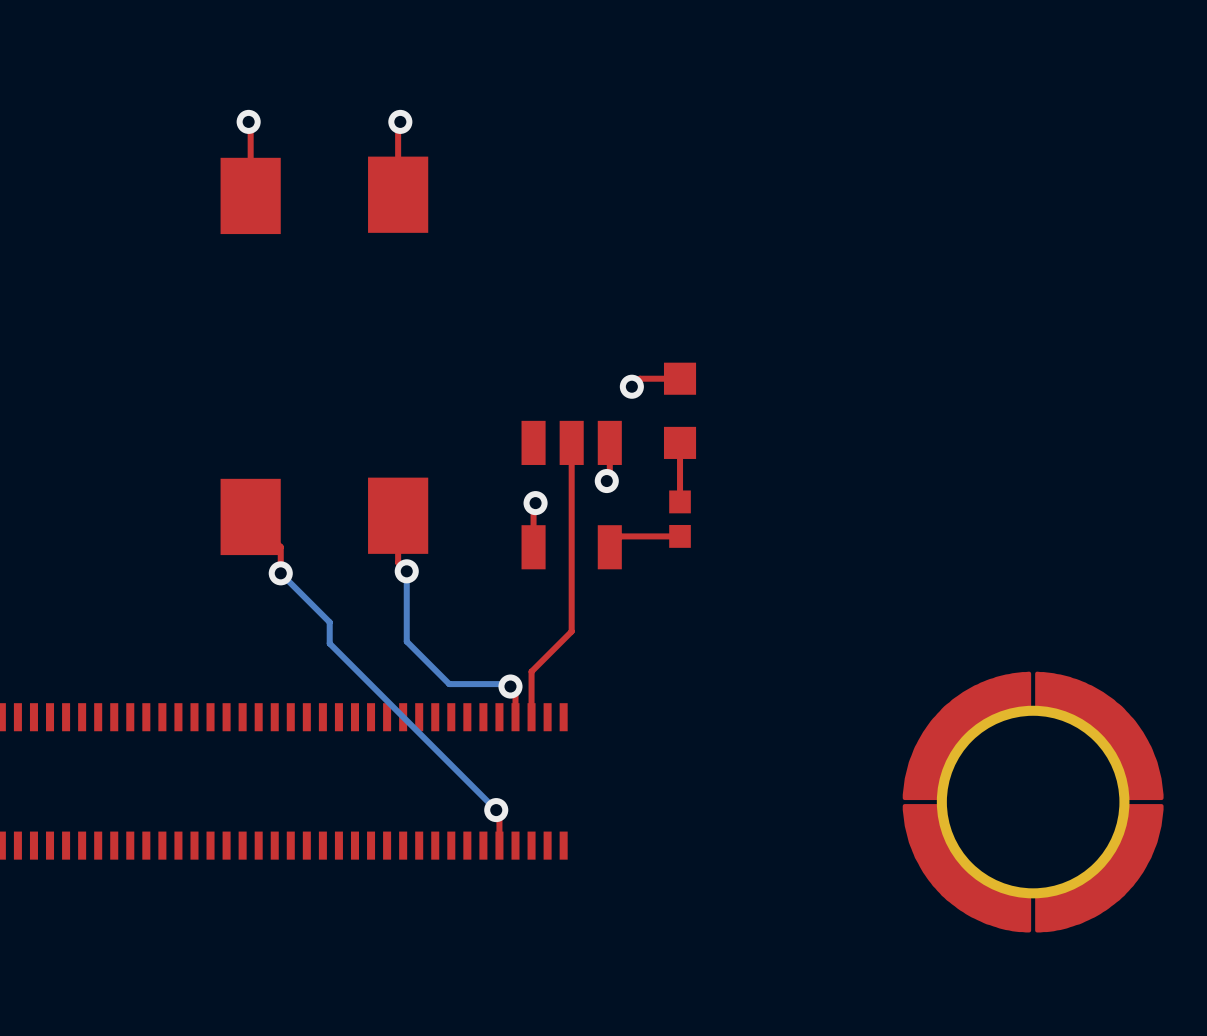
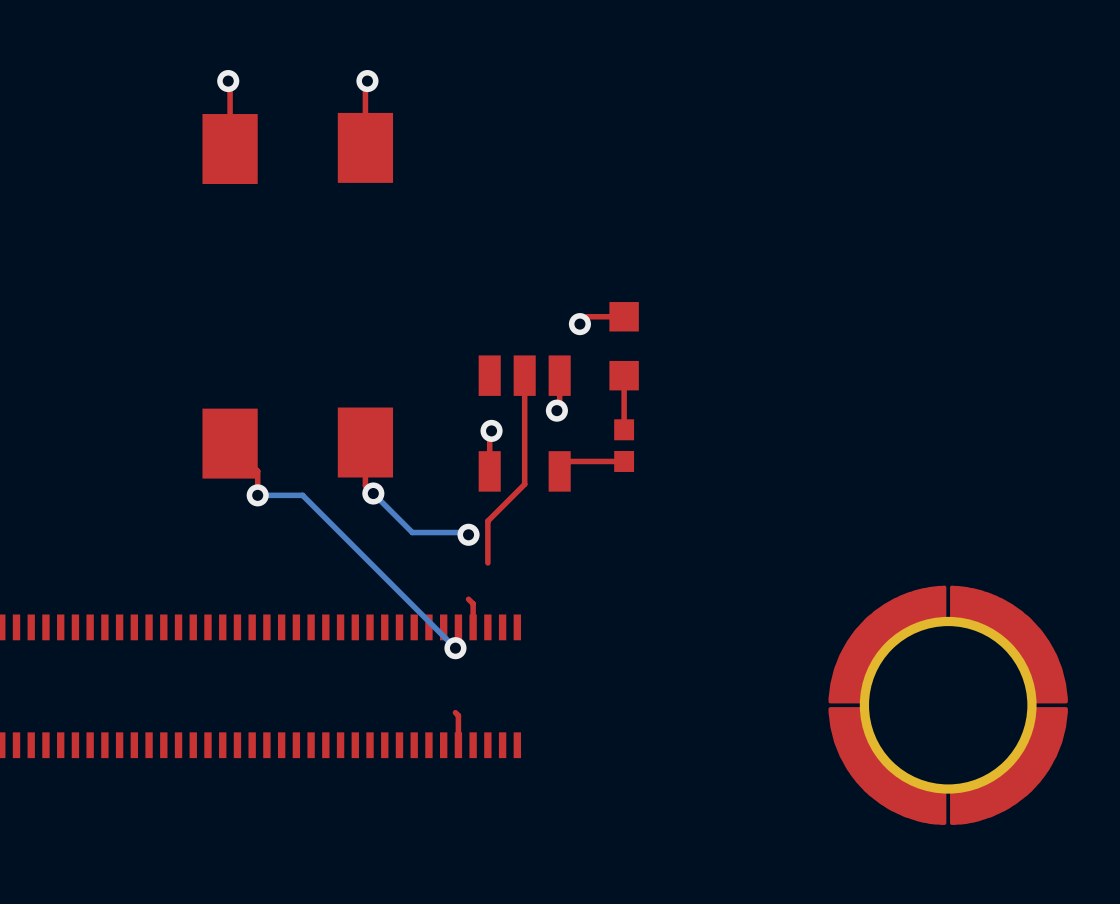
top track: (571, 561) (571, 631) (531, 671) (531, 717) -> (524, 484) (487, 521) (487, 562)
bottom track: (406, 571) (406, 641) (449, 684) (509, 684) (510, 686) -> (373, 493) (412, 532) (467, 532) (468, 534)
bottom track: (280, 573) (329, 622) (329, 643) (496, 810) -> (257, 495) (302, 495) (455, 648)
via: none -> (468, 534)
via: (510, 686) -> none
via: none -> (455, 648)
via: (496, 810) -> none

